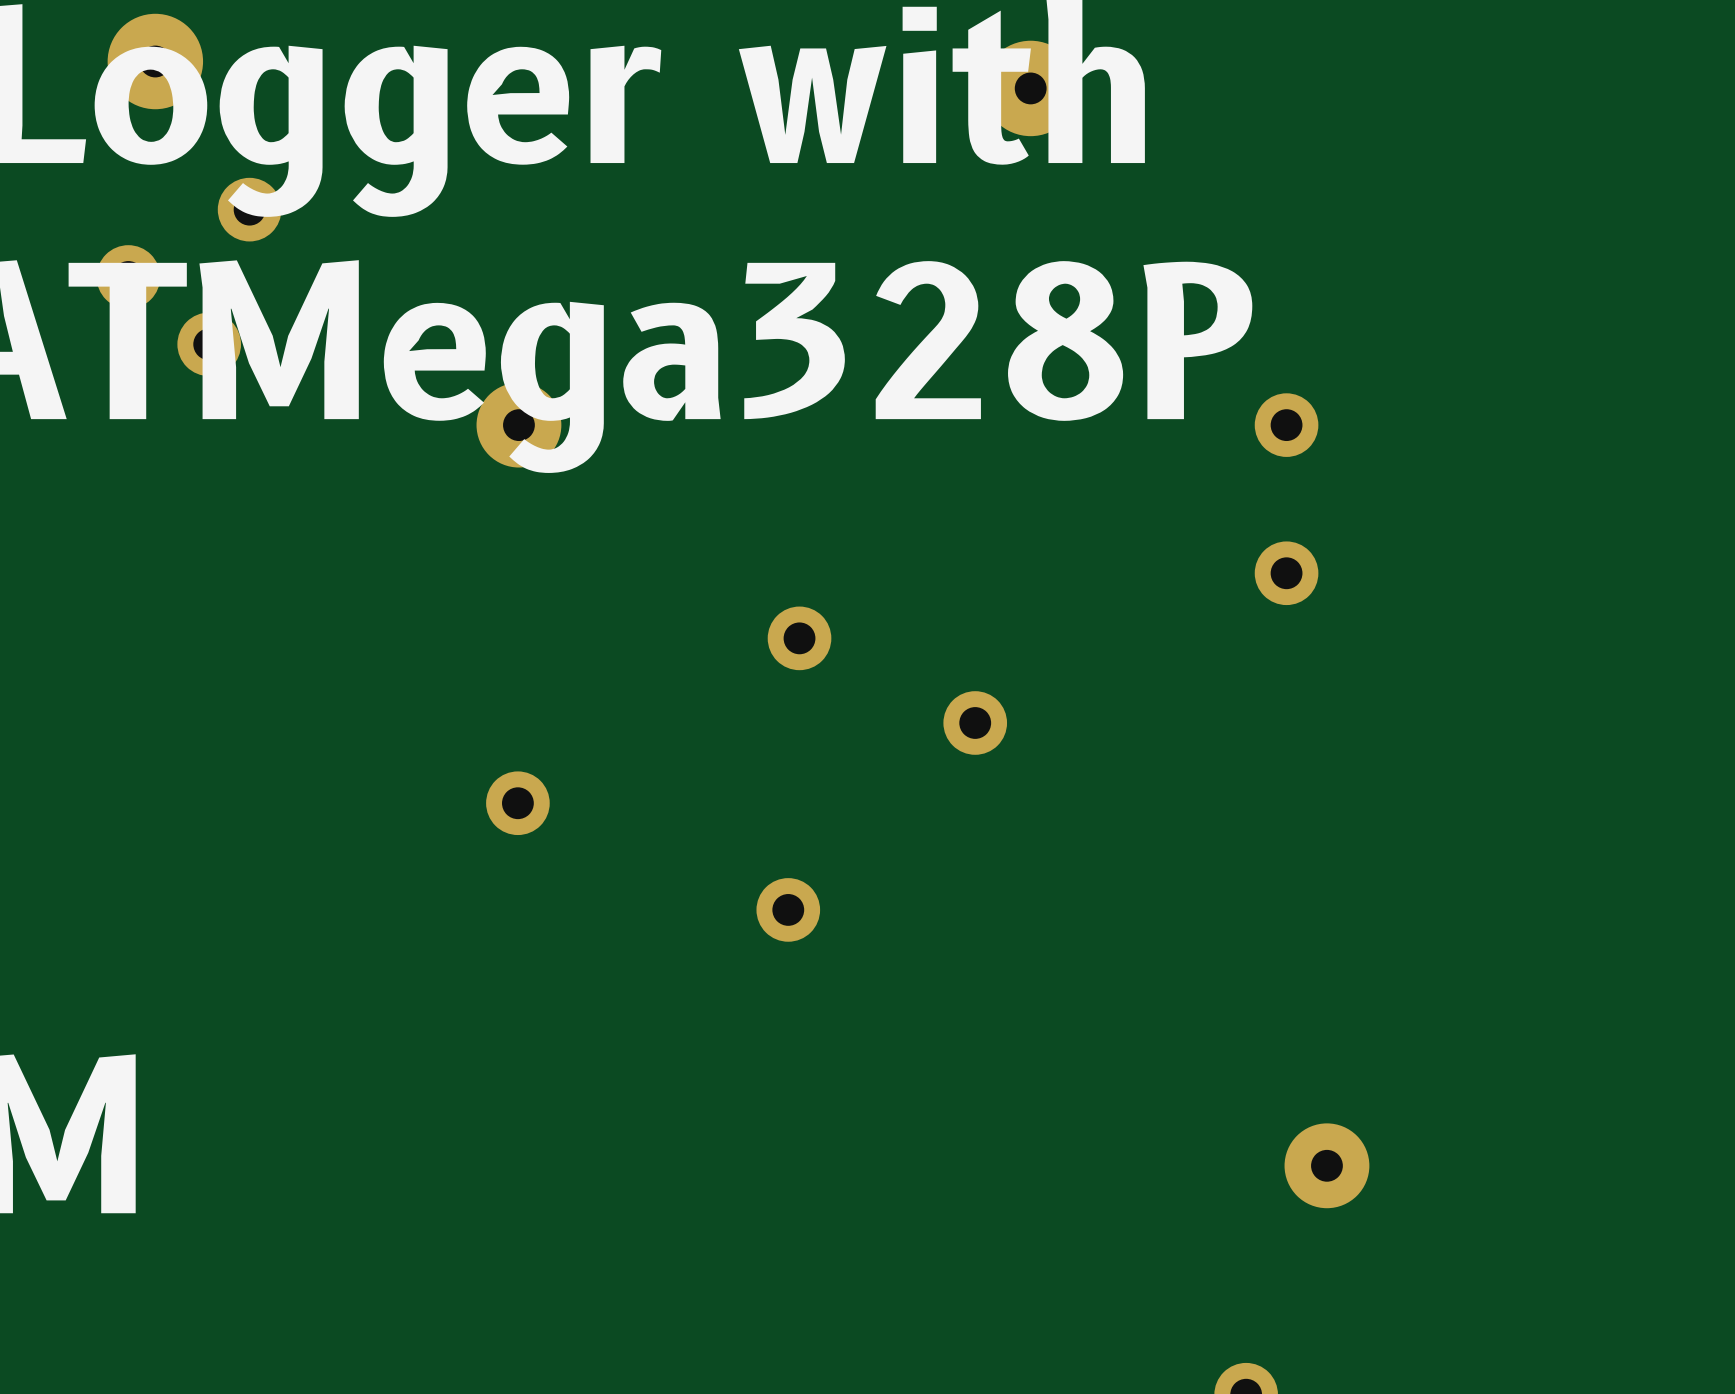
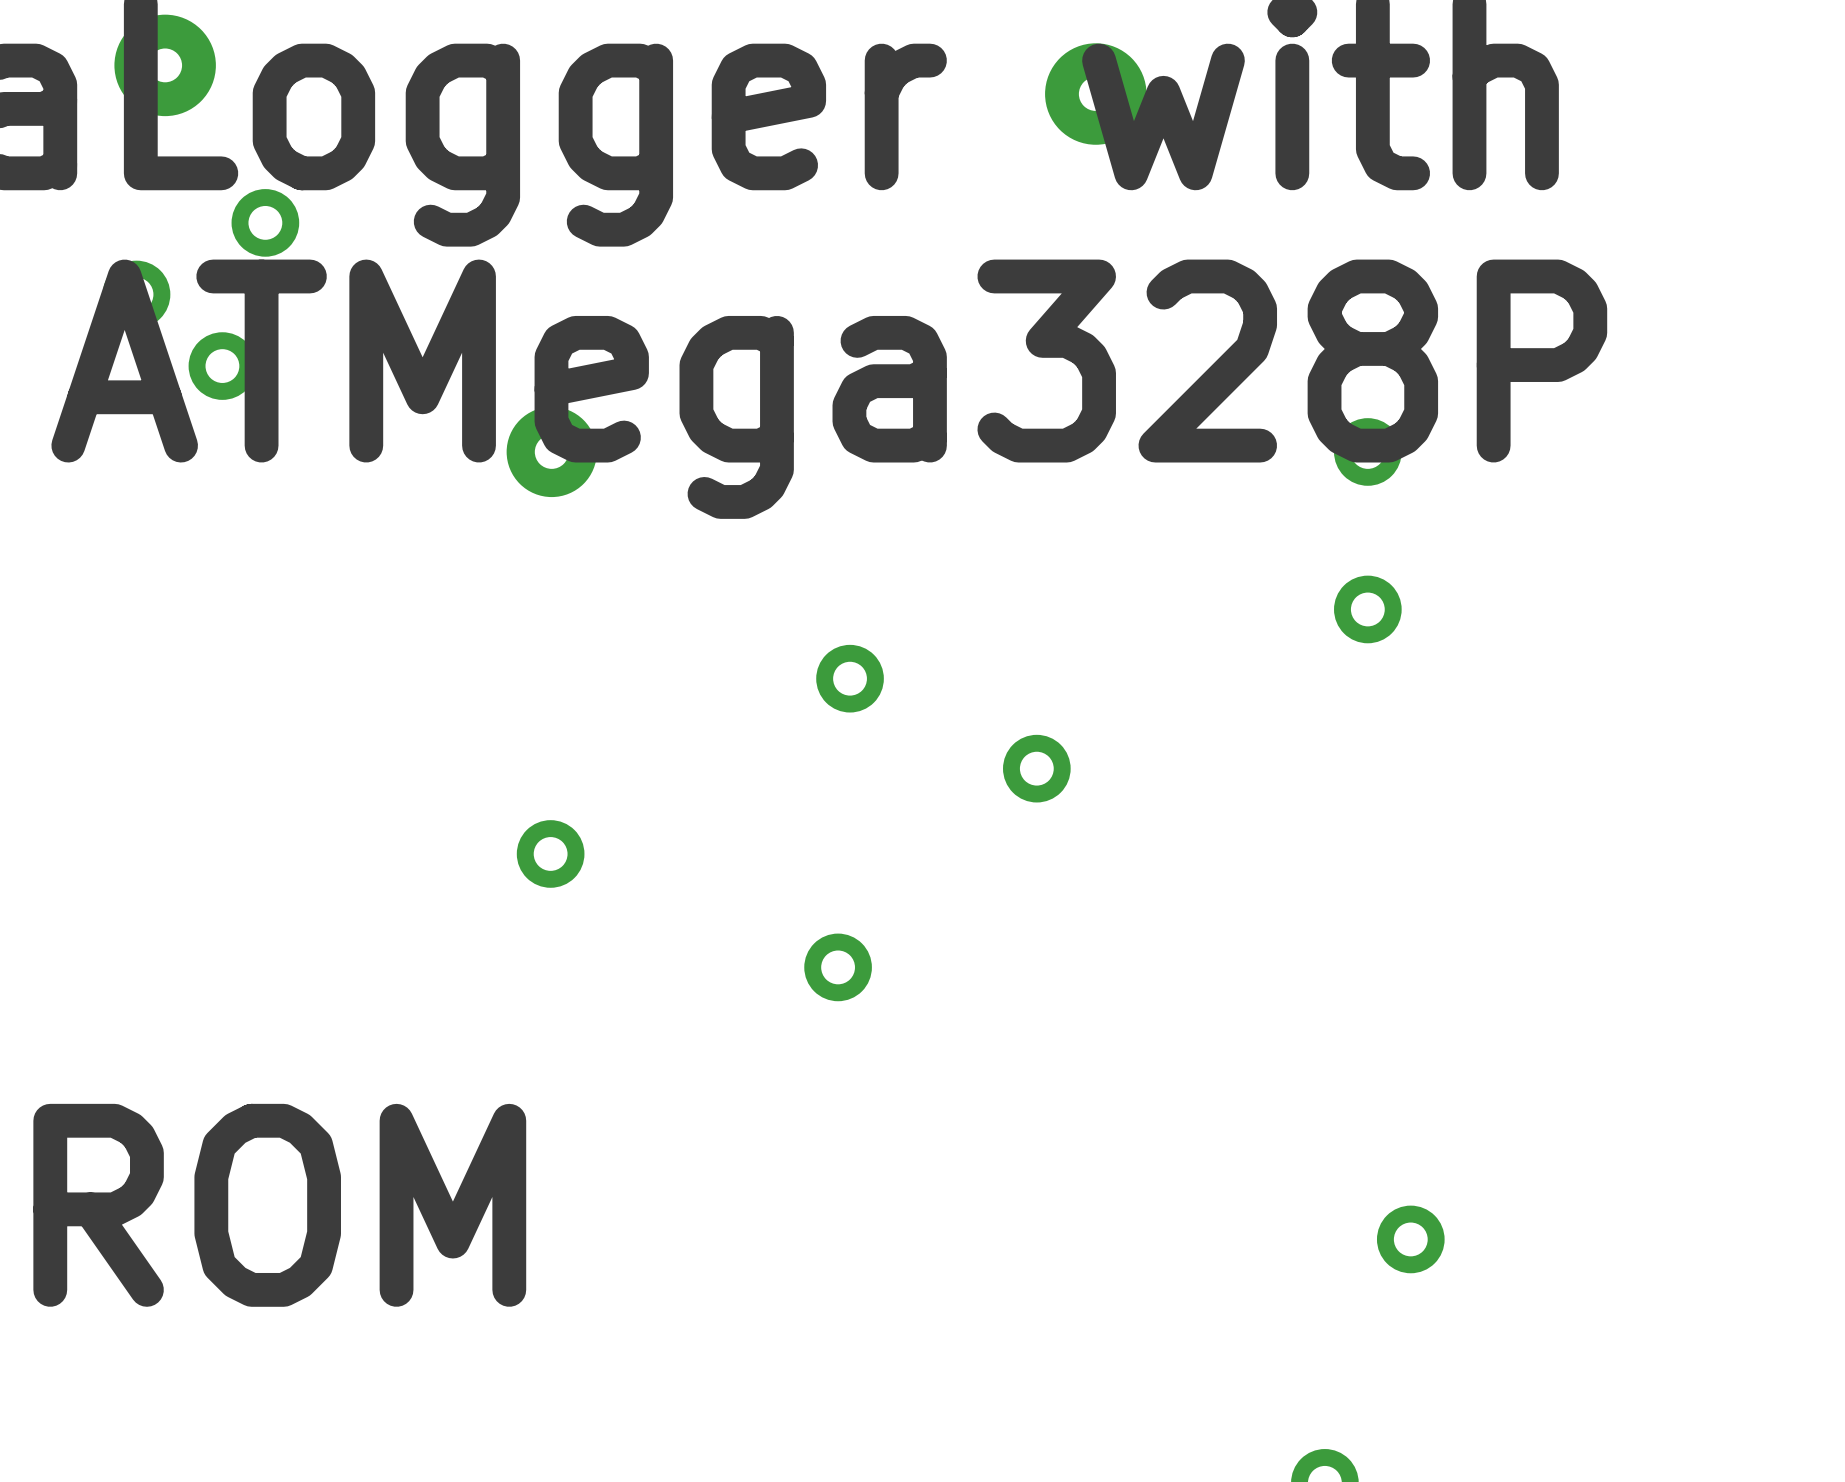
via size: [1284, 1123, 1370, 1209] -> [1376, 1205, 1445, 1274]

